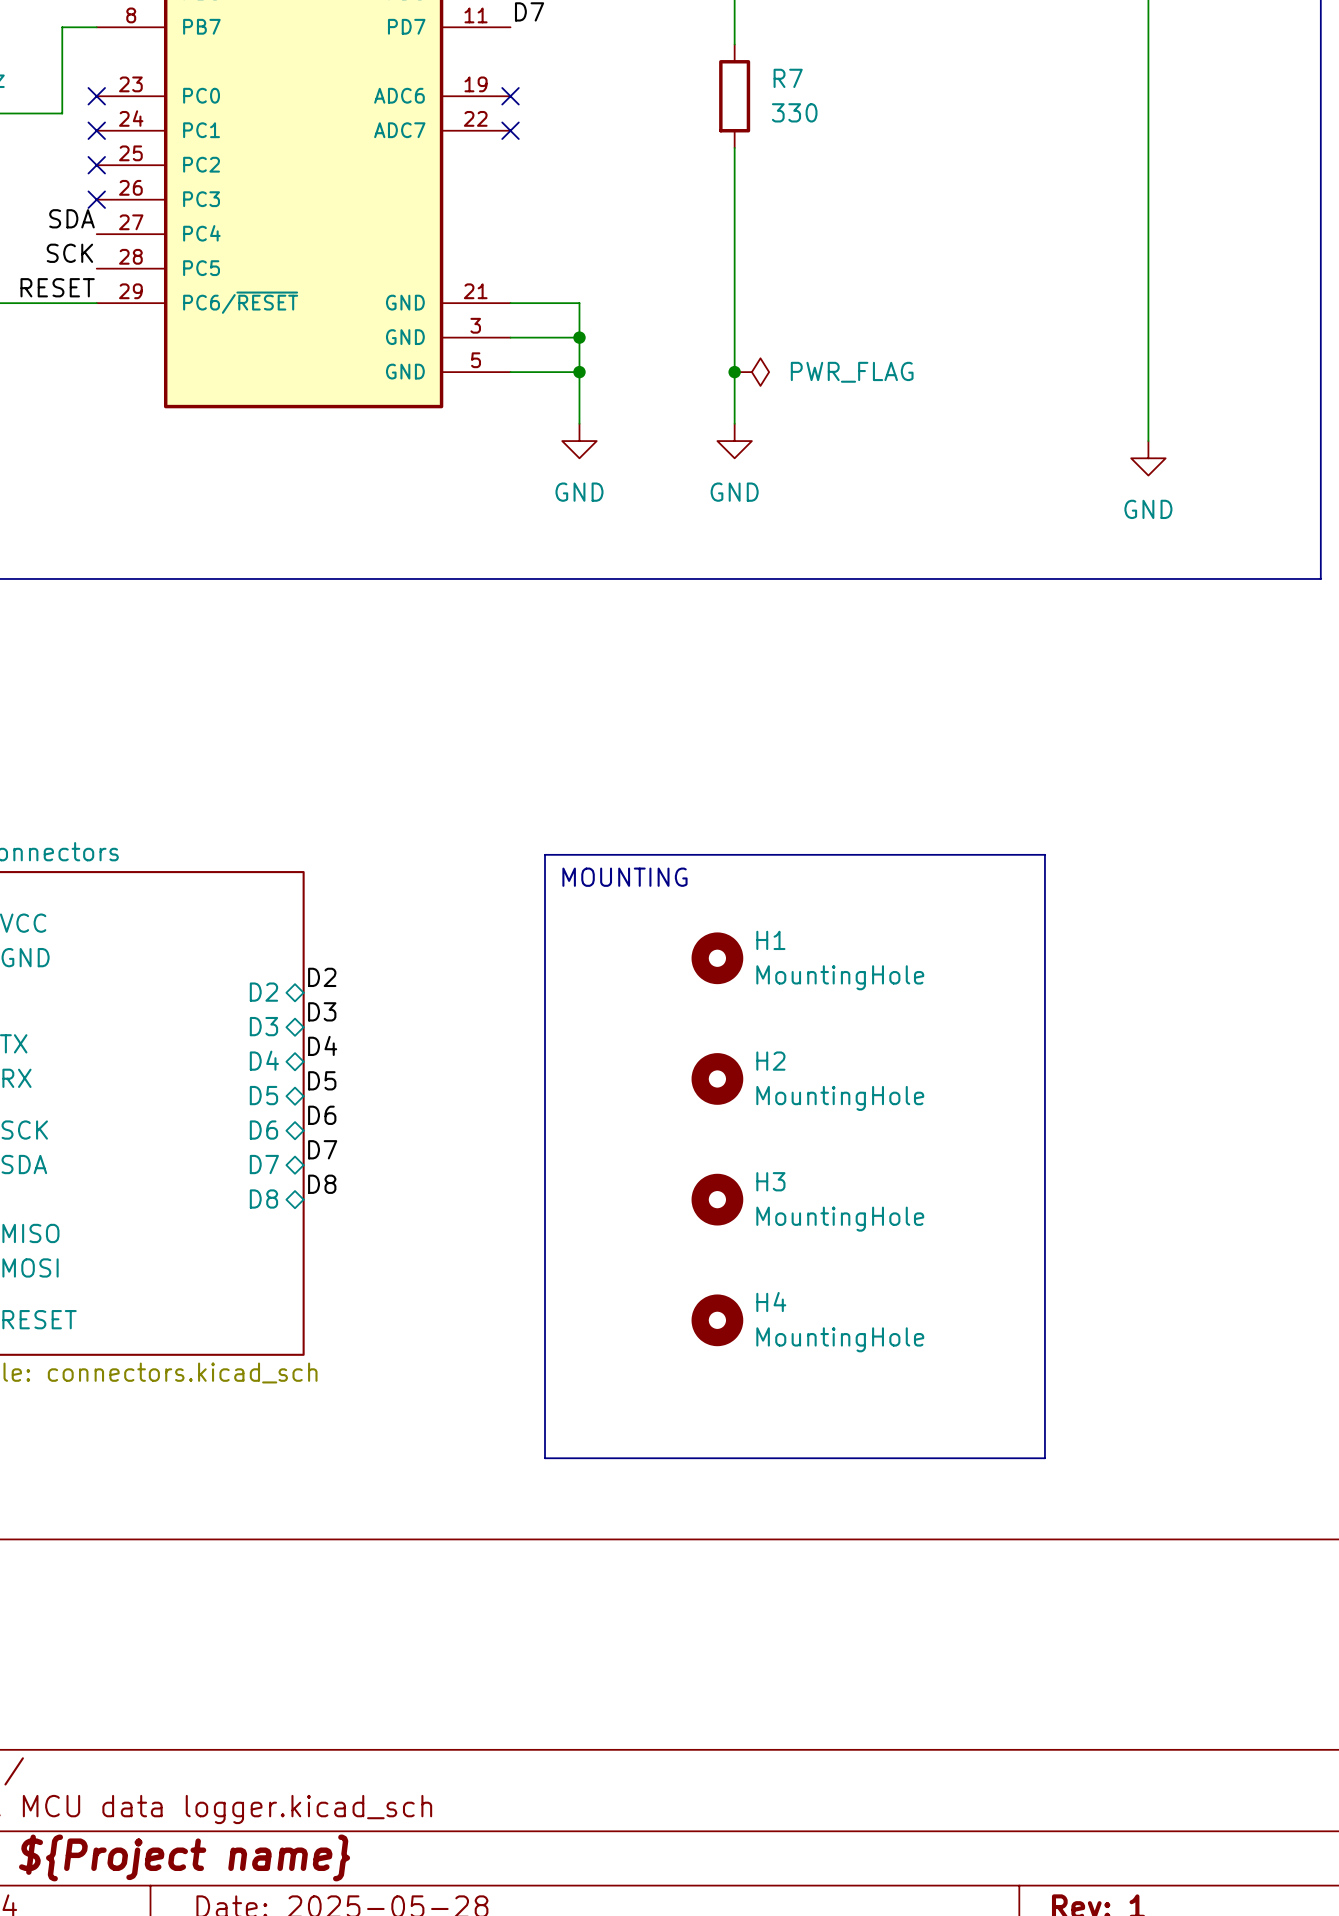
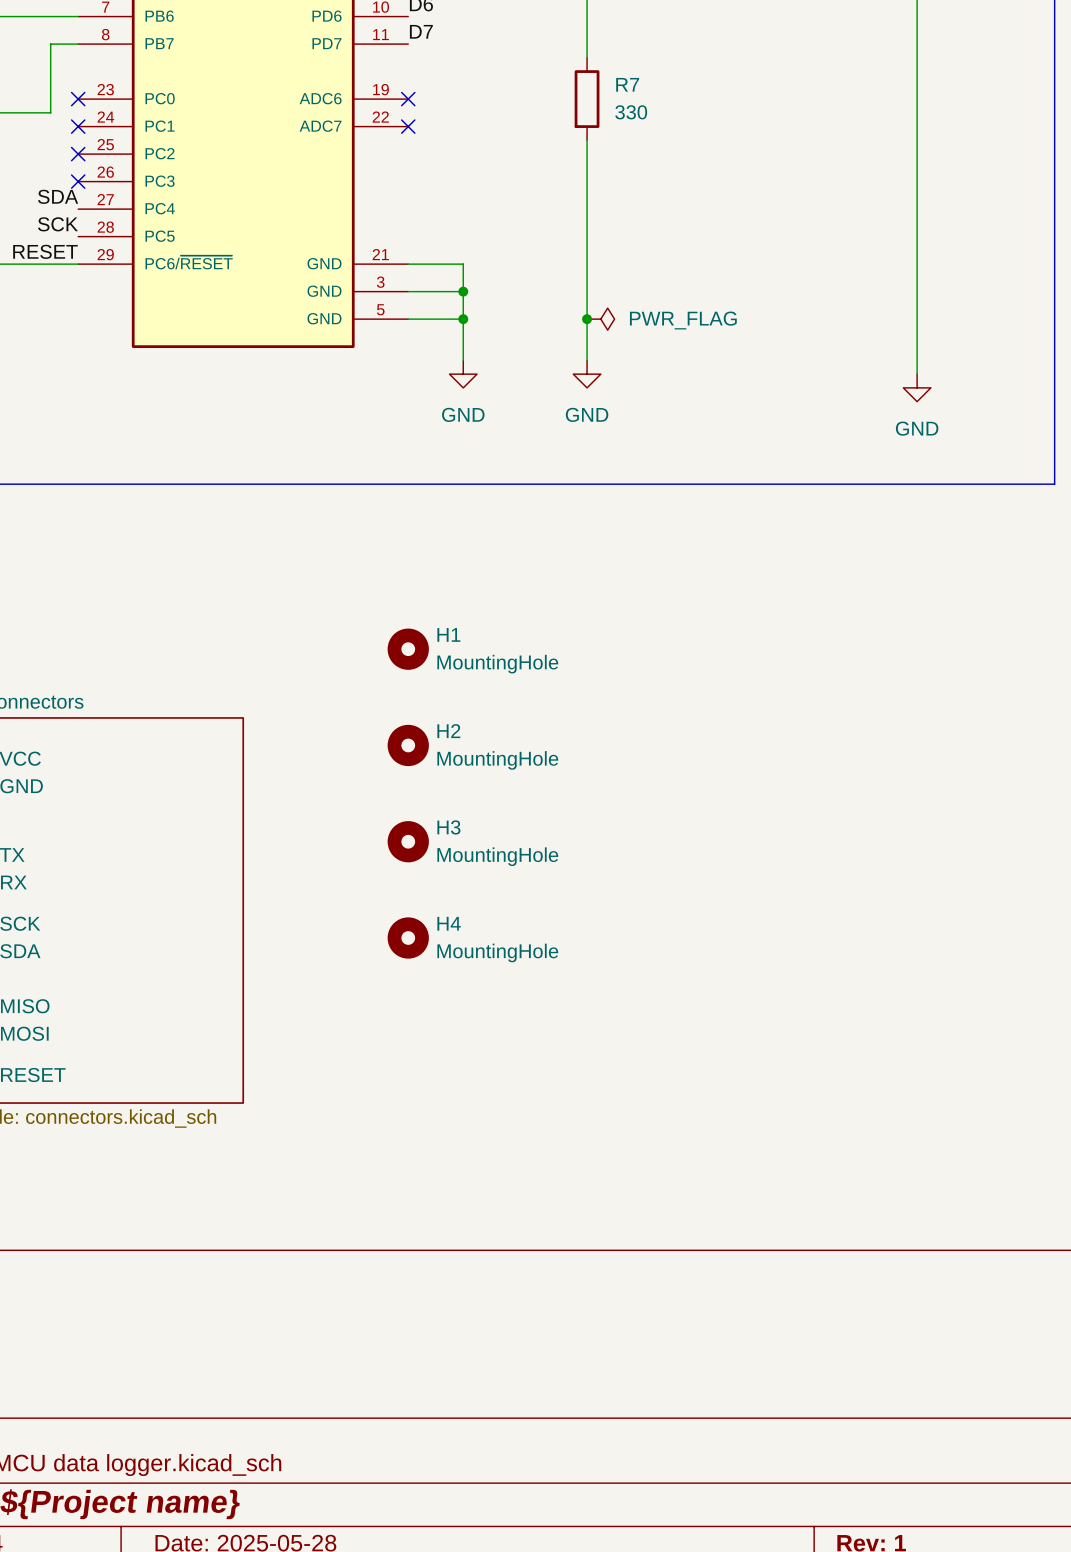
line: (545, 854) (1044, 854) (1044, 1458) (545, 1458) (545, 854) -> none
text: MOUNTING (624, 877) -> none
H1 position: (717, 958) -> (408, 649)
label: D2 (322, 977) -> none
sheet pin: D2 (263, 992) -> none
label: D3 (322, 1011) -> none
sheet pin: D3 (263, 1026) -> none
label: D4 (322, 1045) -> none
sheet pin: D4 (264, 1060) -> none
H2 position: (717, 1078) -> (408, 745)
label: D5 (322, 1080) -> none
sheet pin: D5 (263, 1095) -> none
label: D6 (322, 1115) -> none
sheet pin: D6 (263, 1130) -> none
label: D7 (322, 1149) -> none
sheet pin: D7 (264, 1164) -> none
label: D8 (322, 1184) -> none
sheet pin: D8 (263, 1199) -> none
H3 position: (717, 1199) -> (408, 841)
H4 position: (717, 1320) -> (408, 938)

